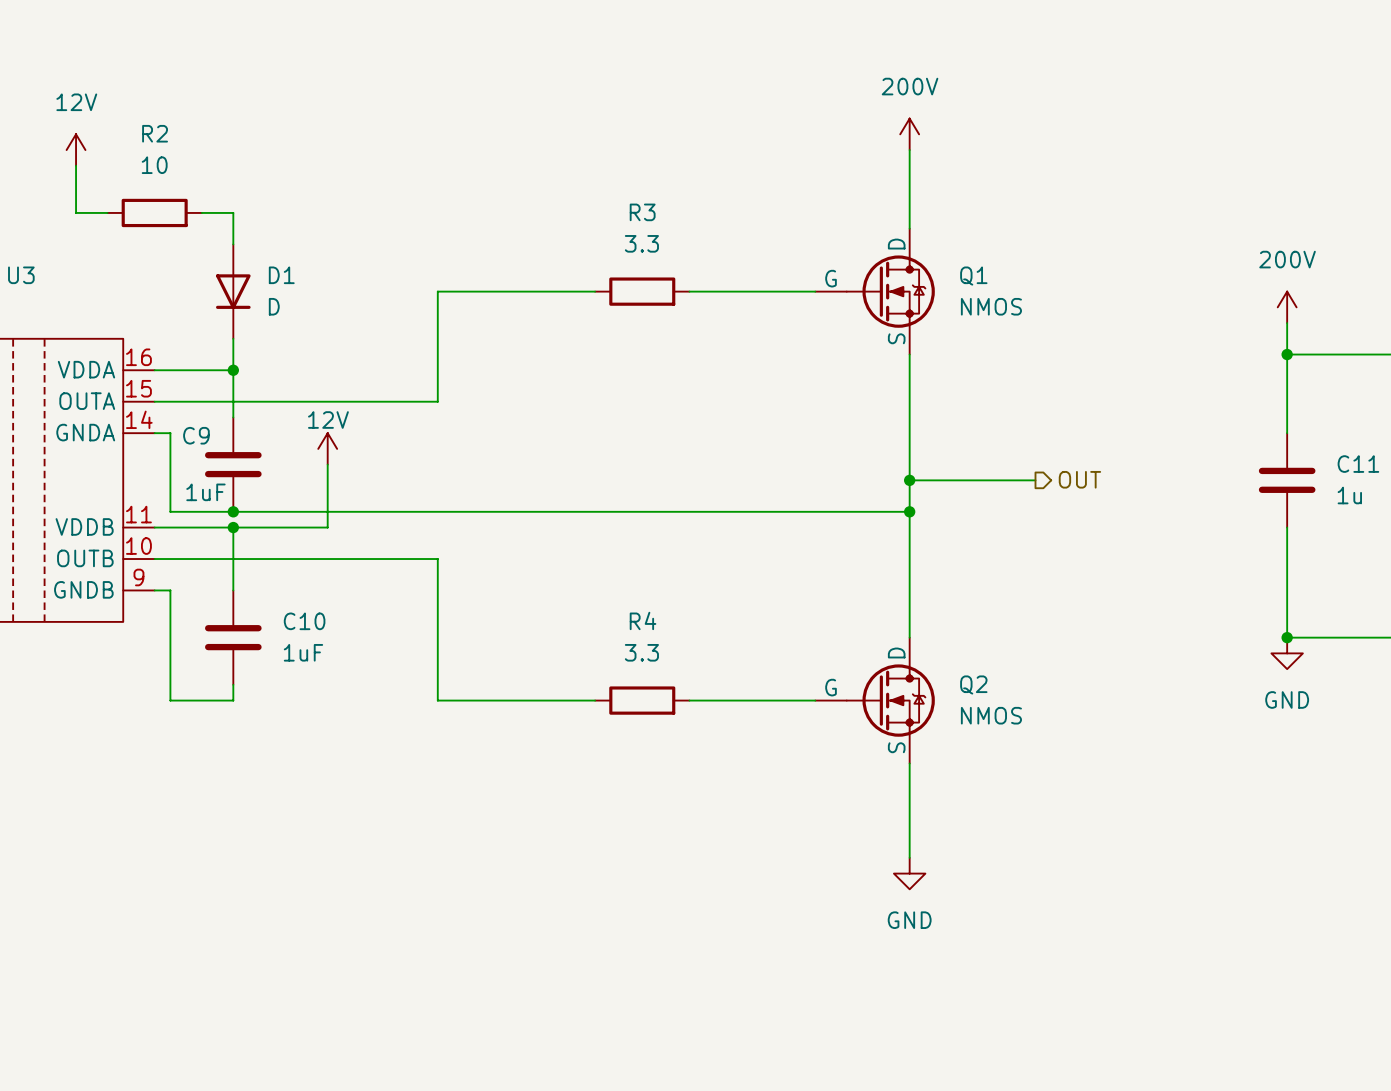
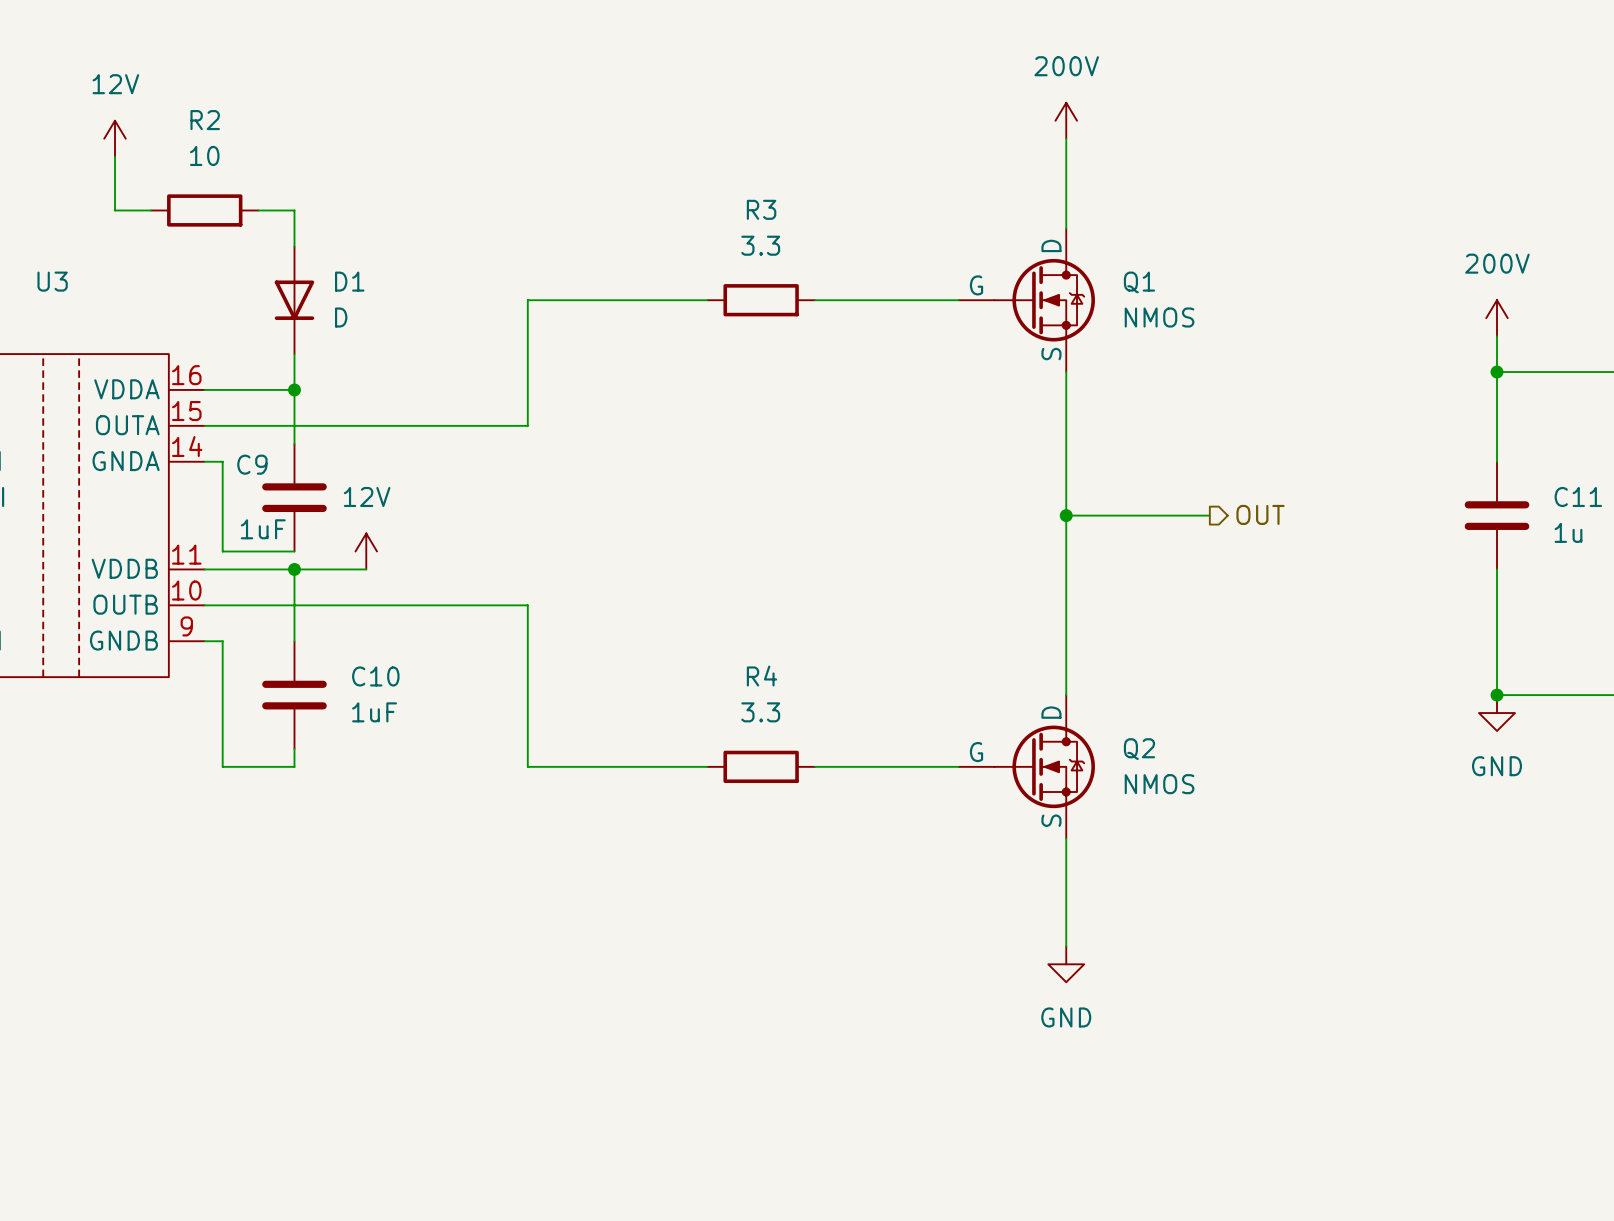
power symbol text position: 12V (328, 420) -> 12V (367, 496)
power symbol position: 12V (327, 448) -> 12V (366, 551)
wire: (327, 464) (327, 527) (296, 527) -> none
wire: (233, 511) (909, 511) -> none
junction: (233, 511) -> none
junction: (909, 511) -> none

